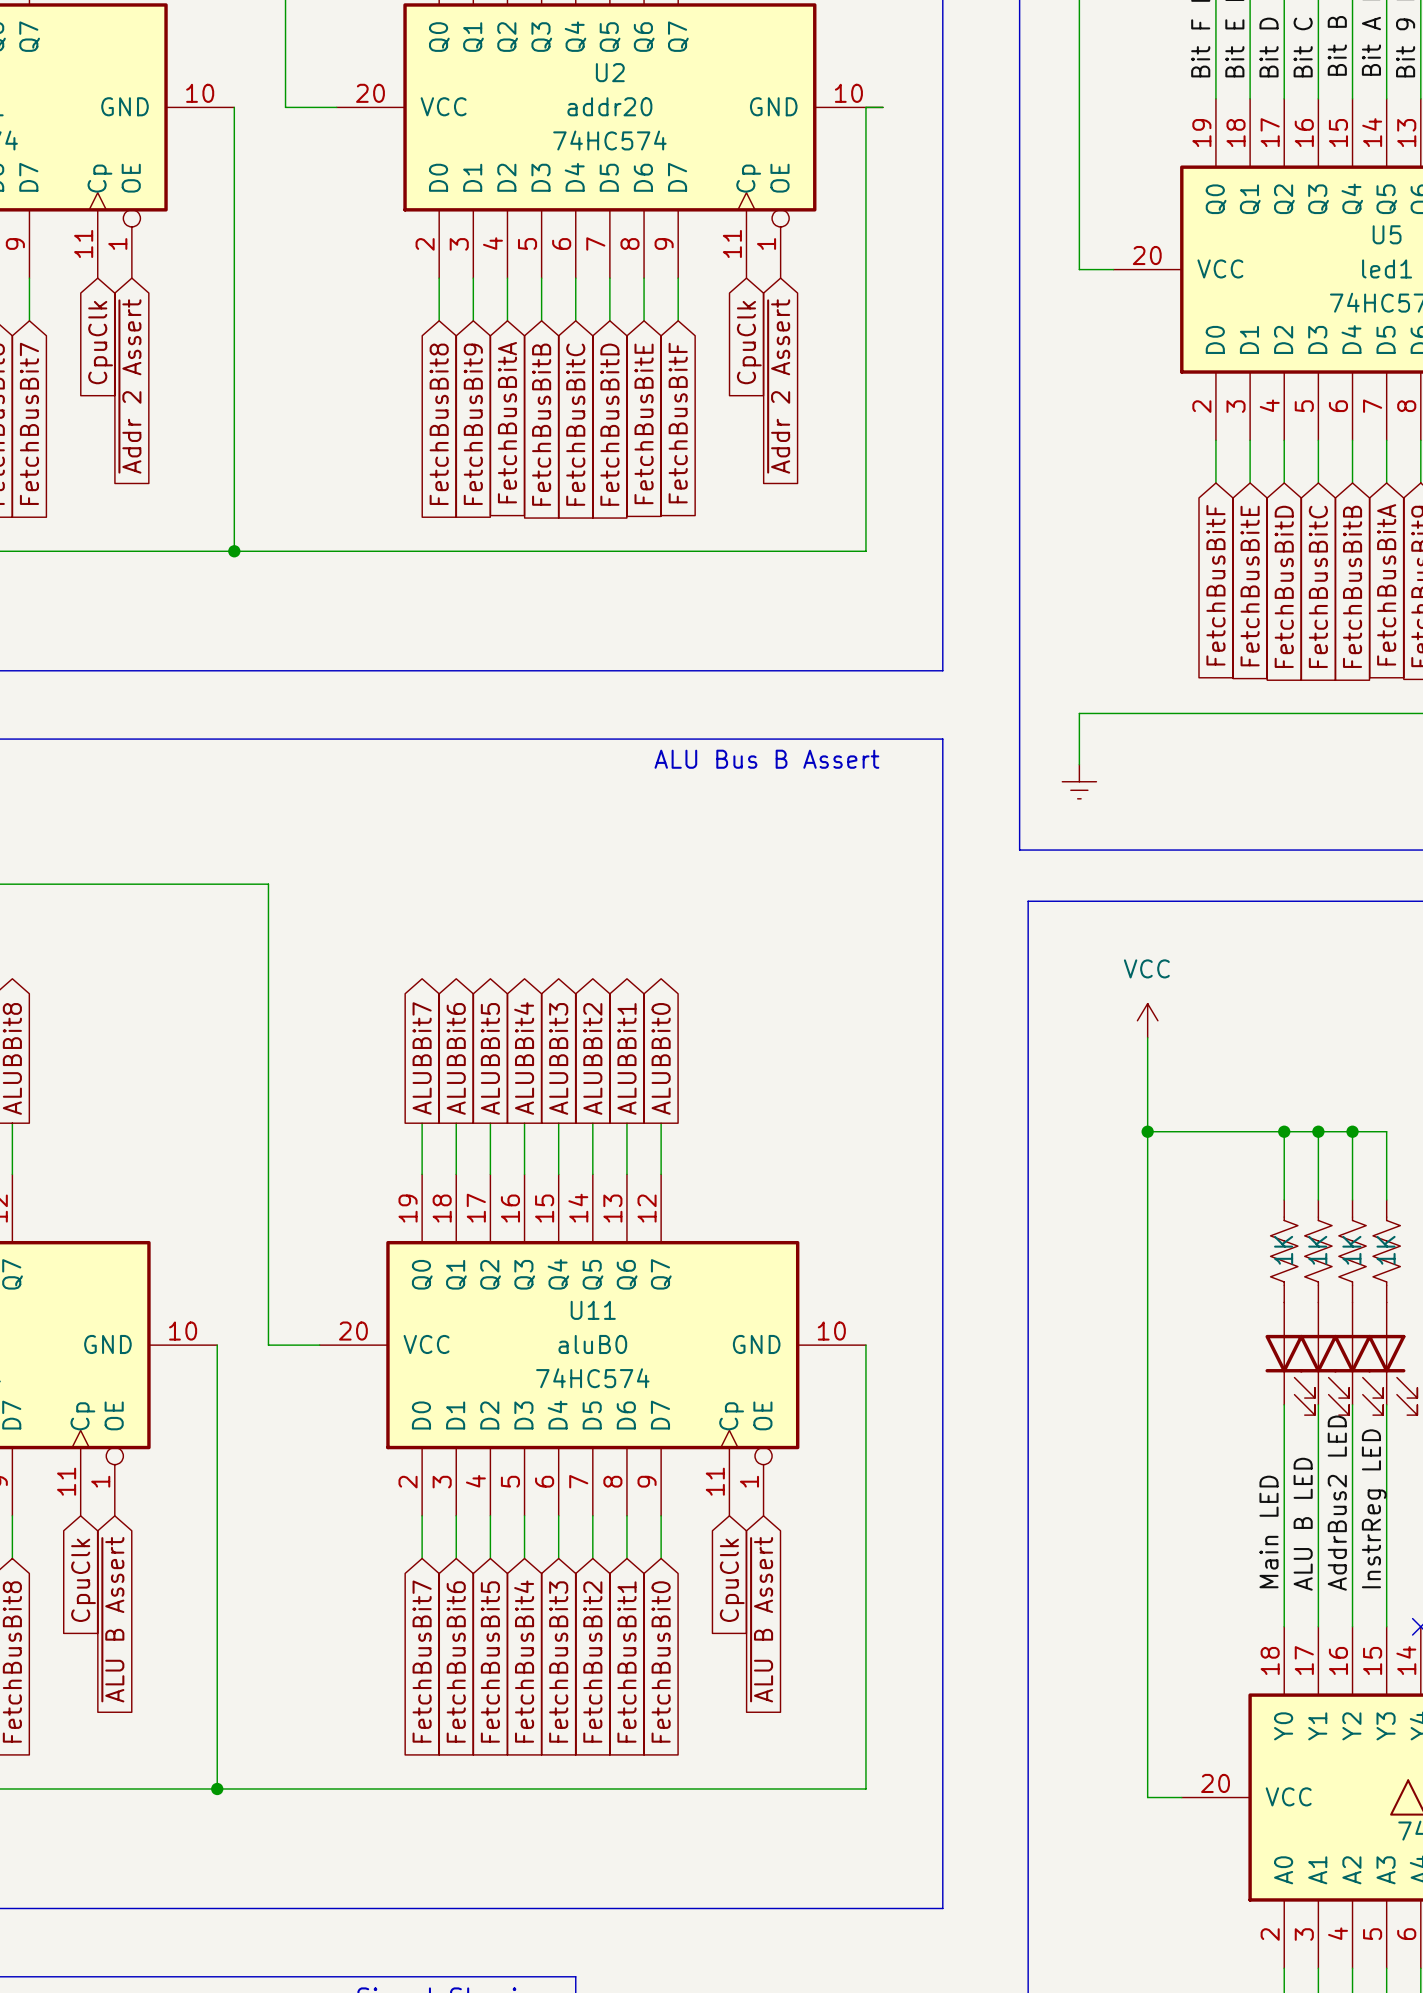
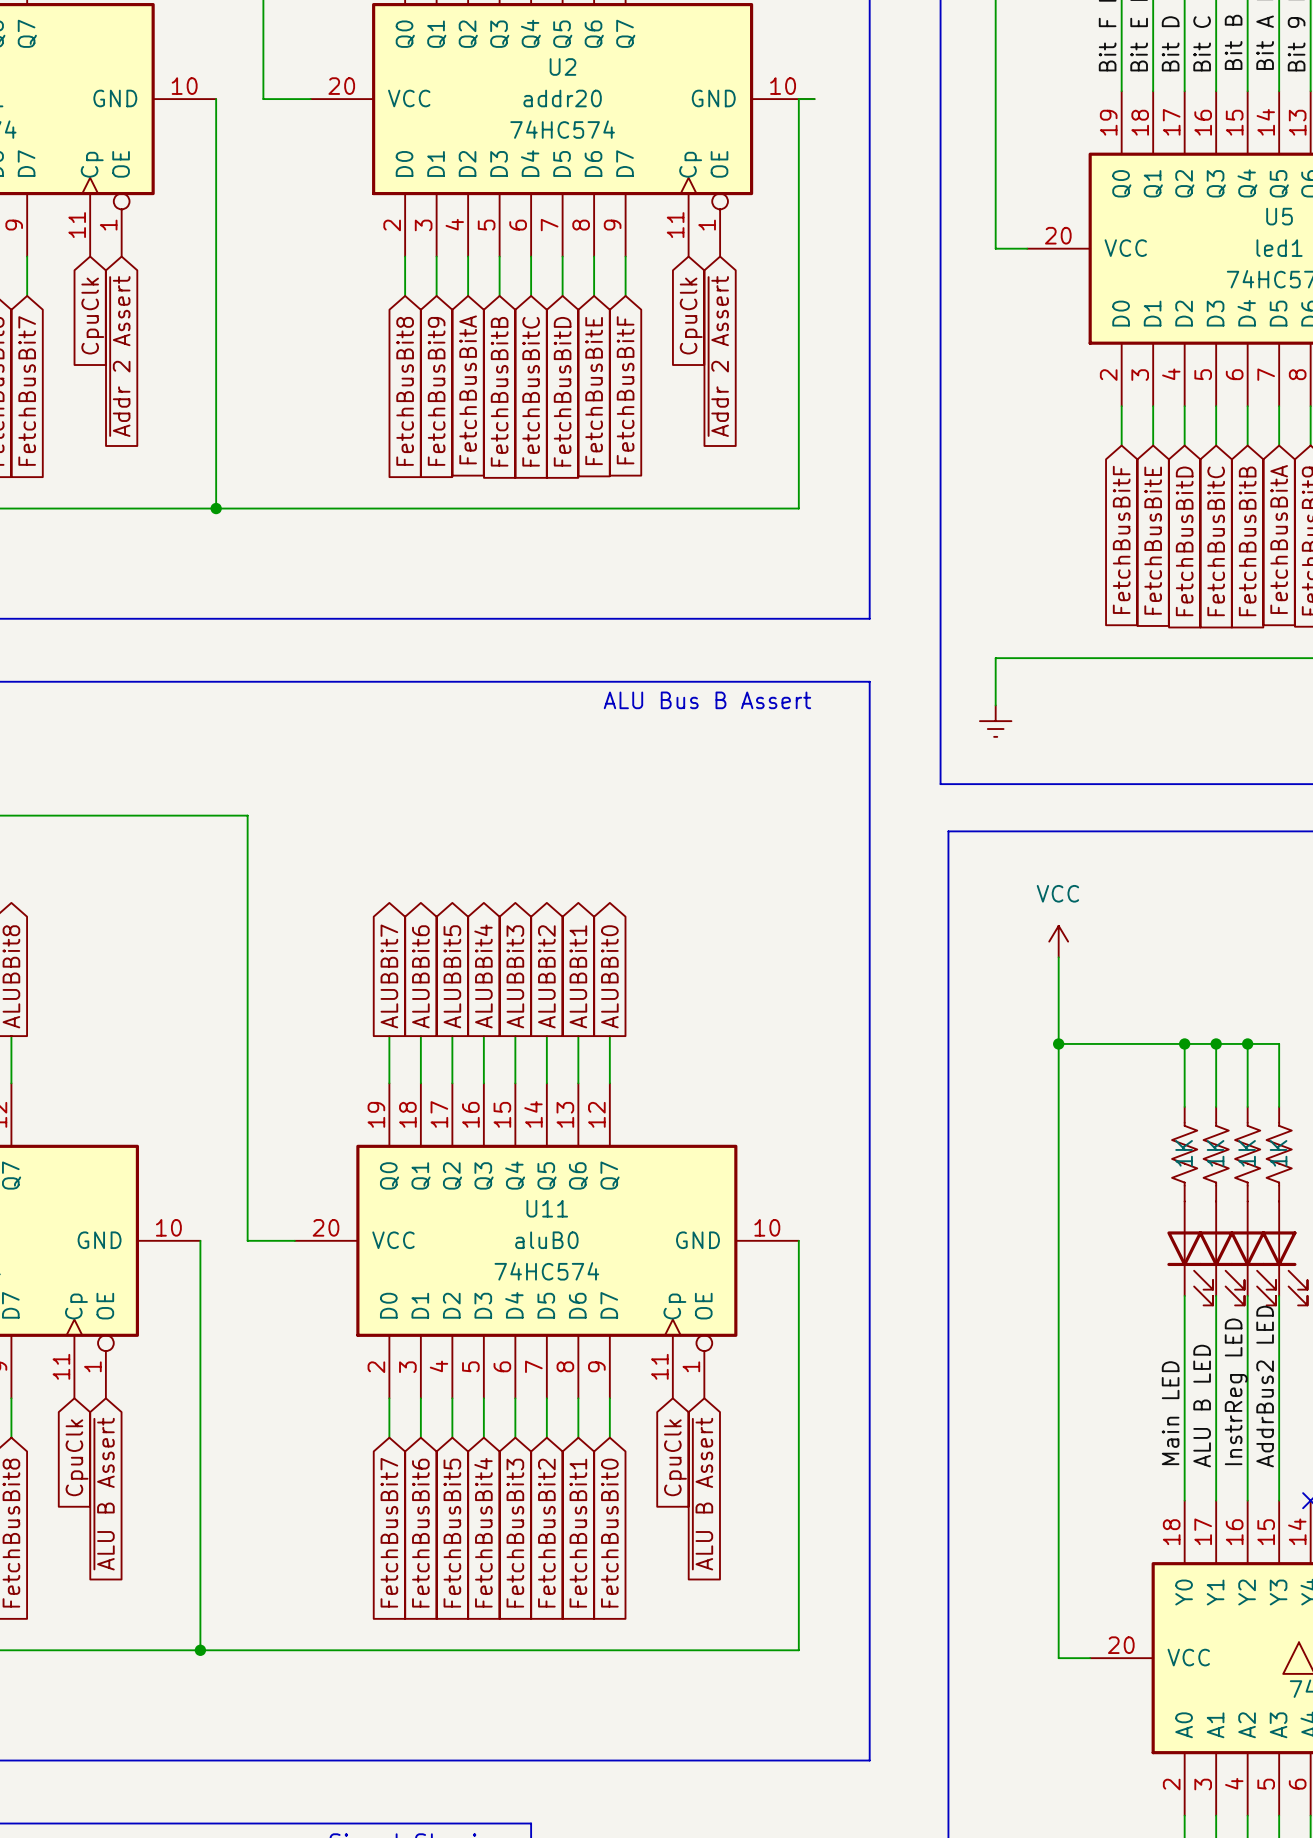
label: AddrBus2 LED (1337, 1503) -> InstrReg LED (1236, 1391)
label: InstrReg LED (1374, 1508) -> AddrBus2 LED (1265, 1386)

